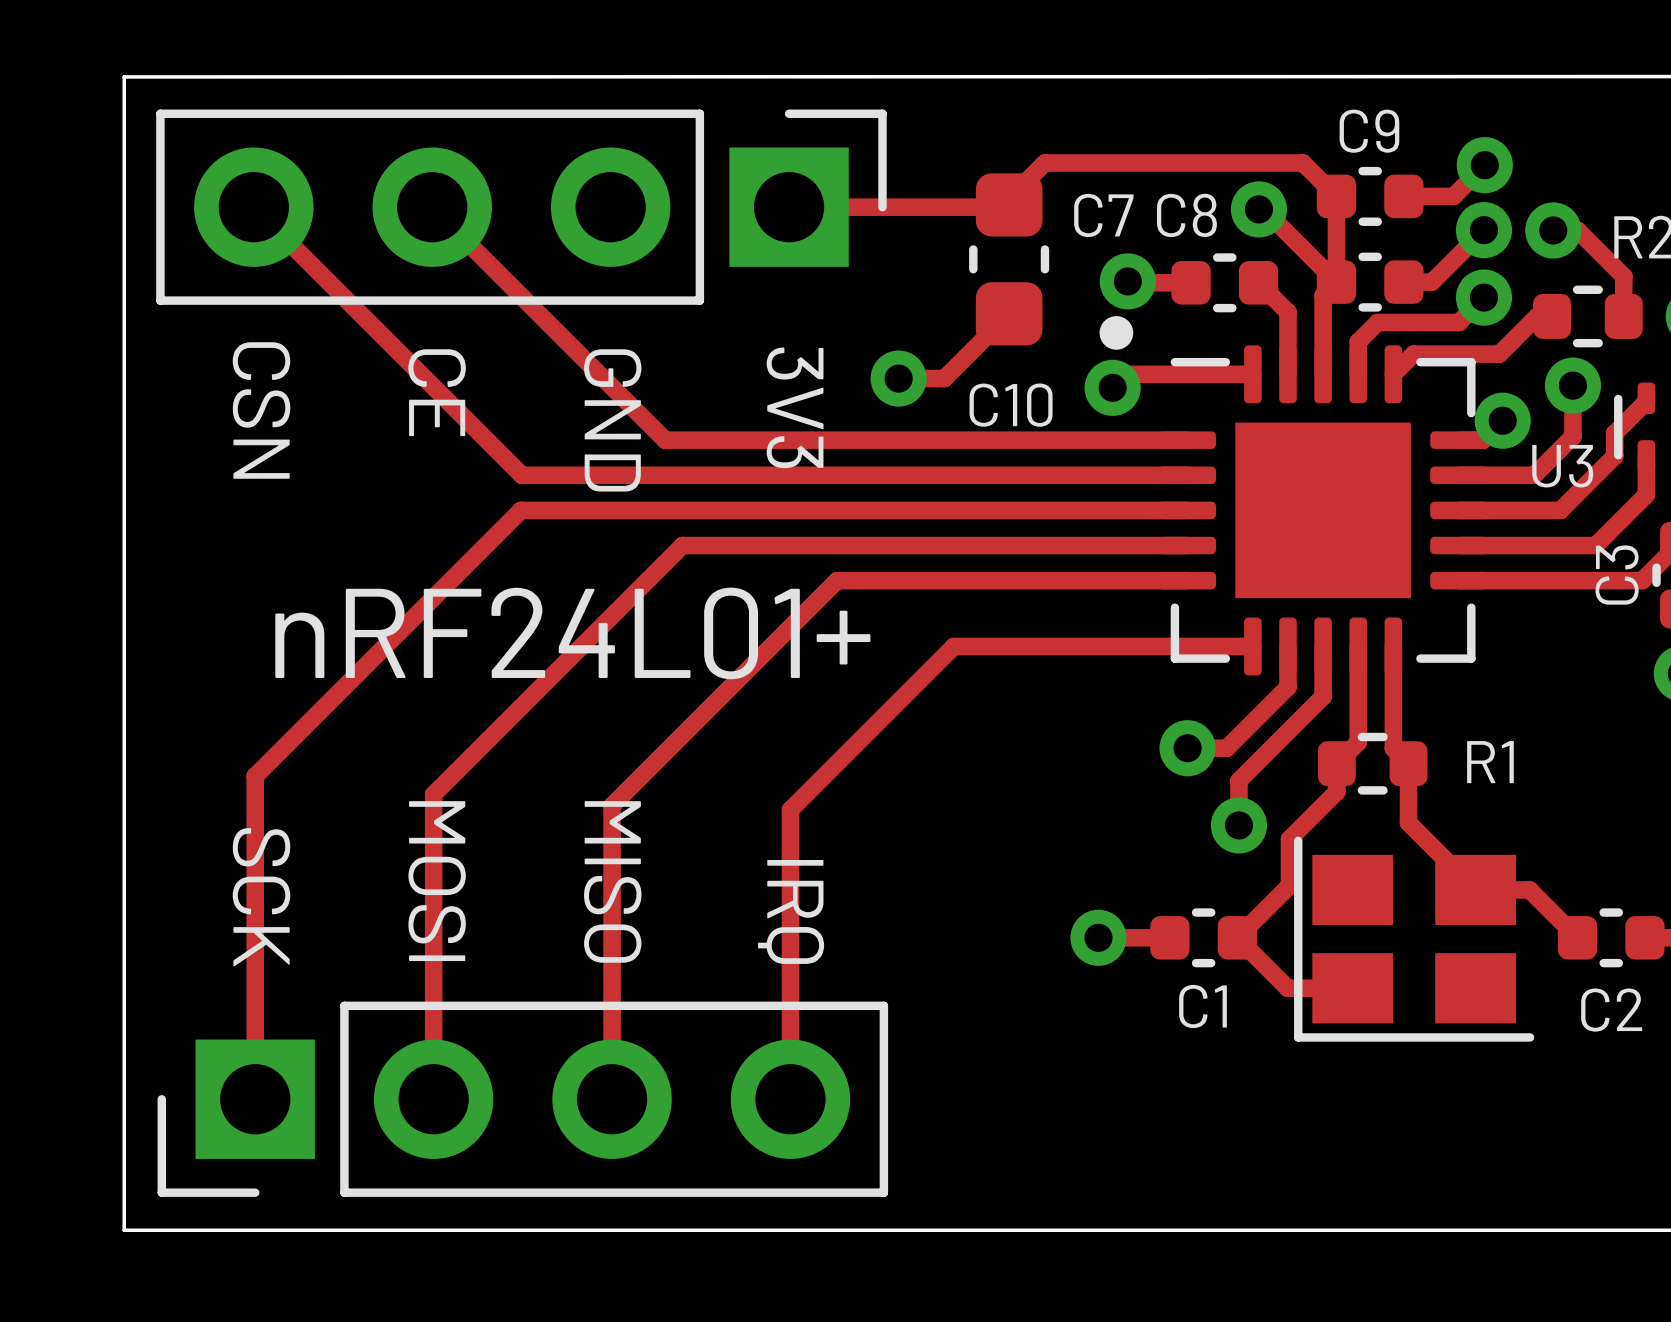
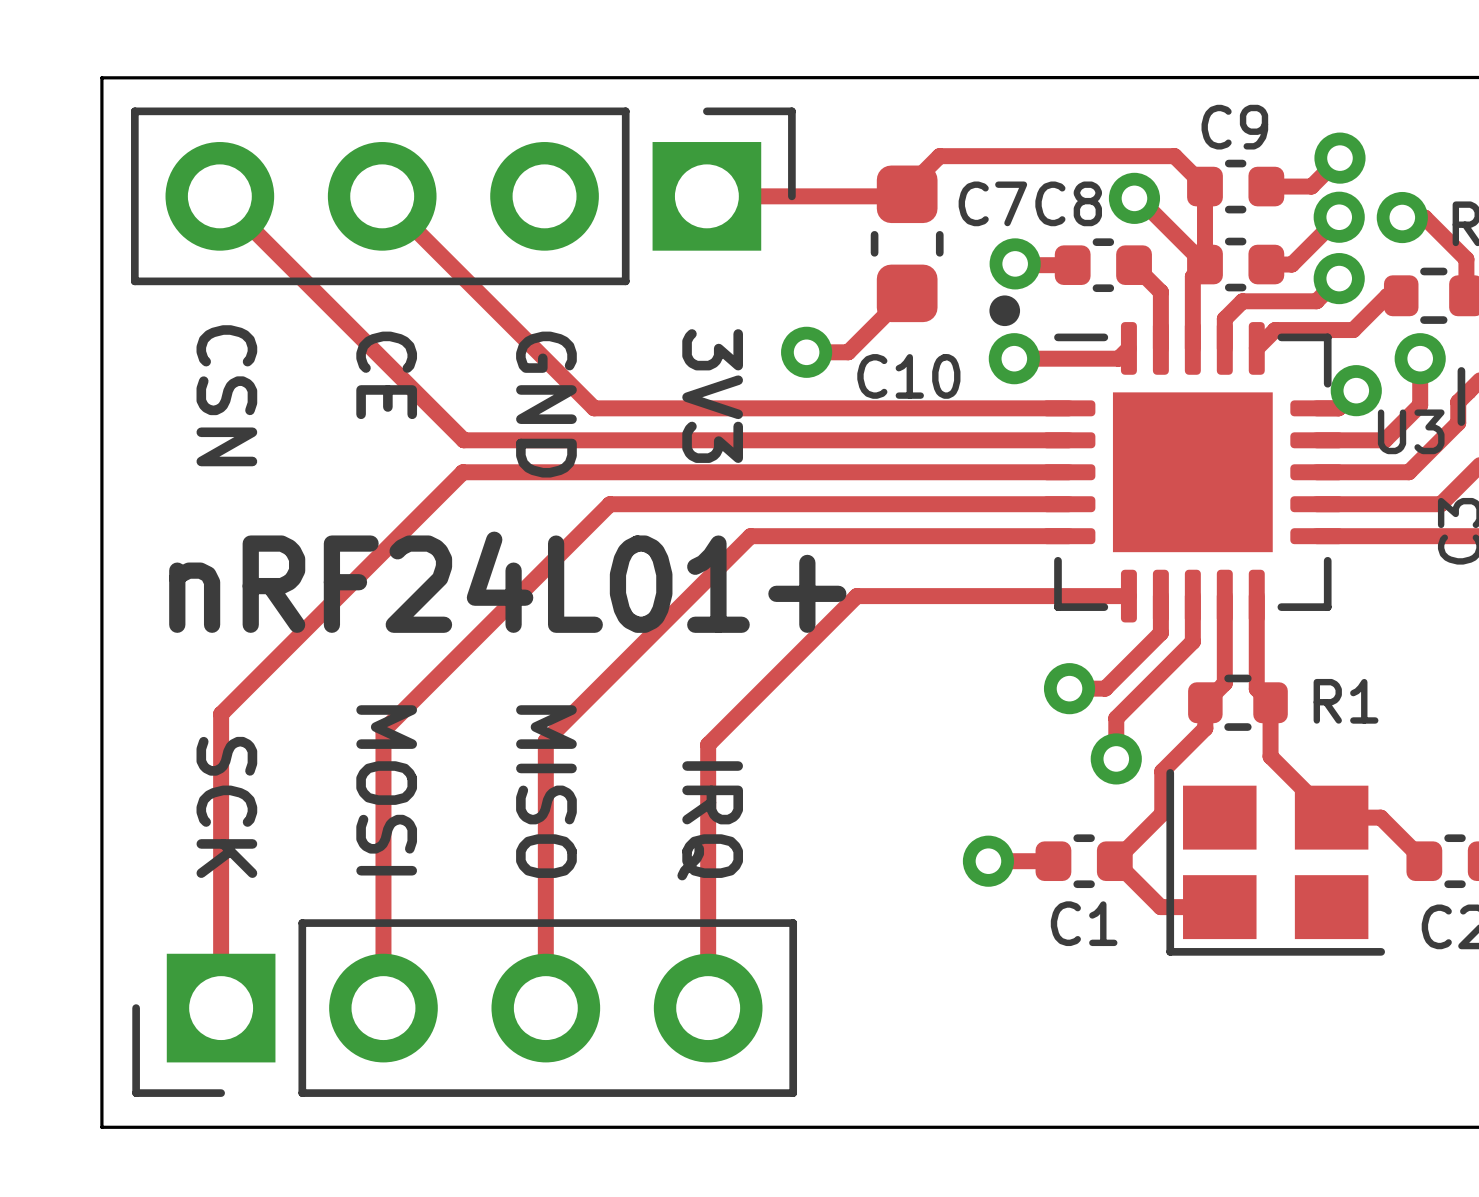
track: (1252, 374) (1126, 374) (1112, 387) -> (1128, 348) (1118, 358) (1014, 358)
via position: (1112, 387) -> (1014, 358)

